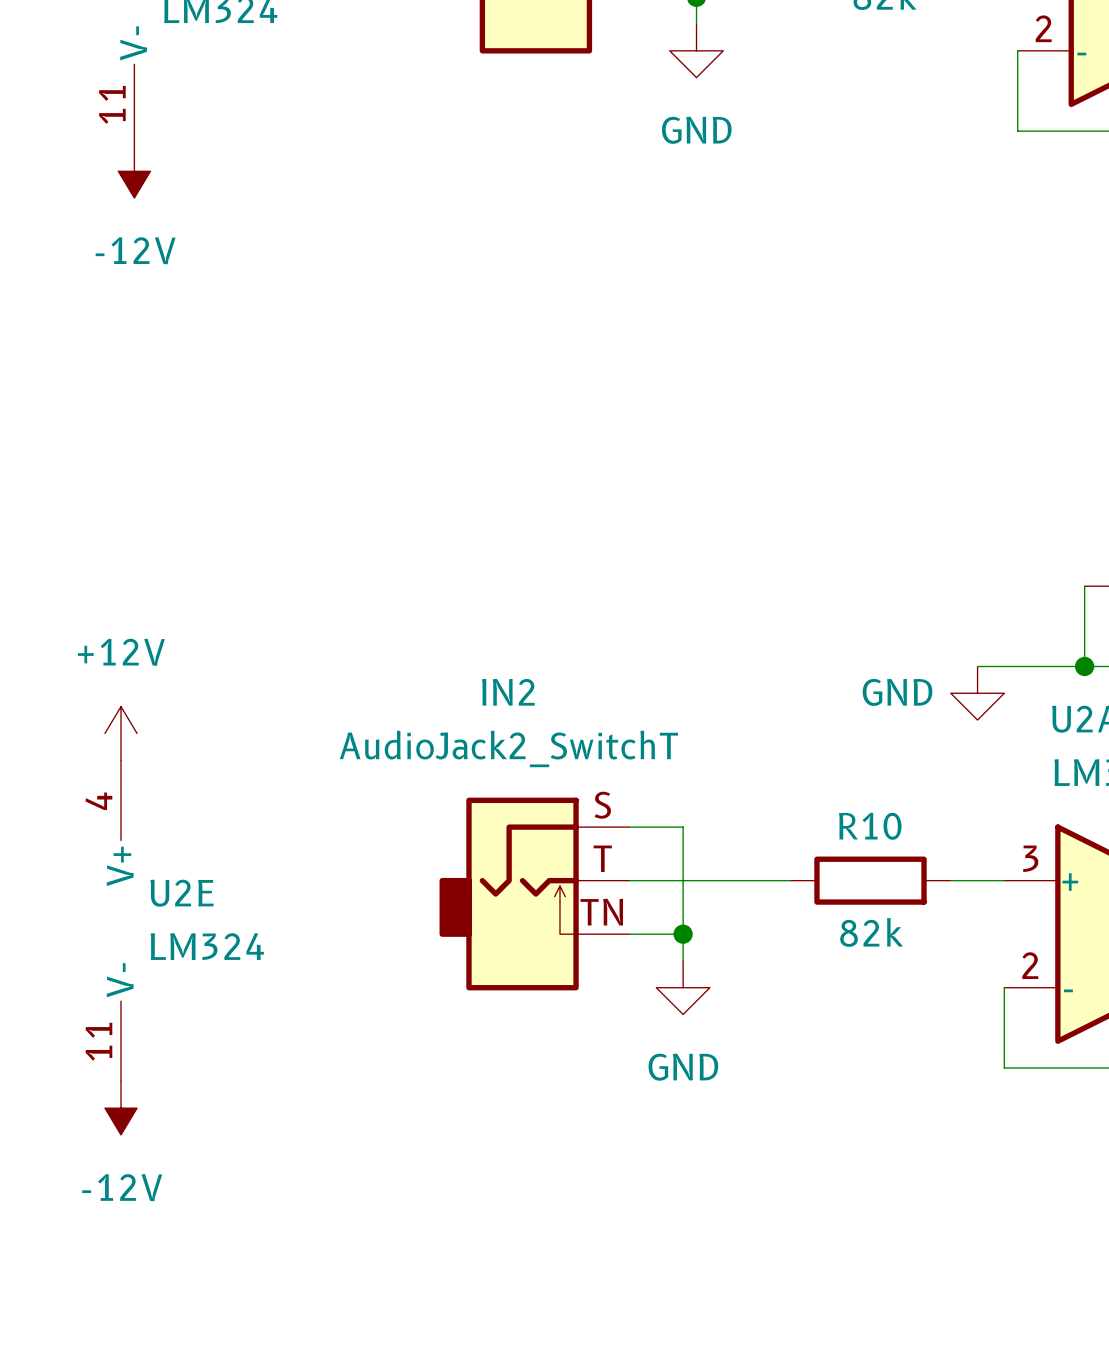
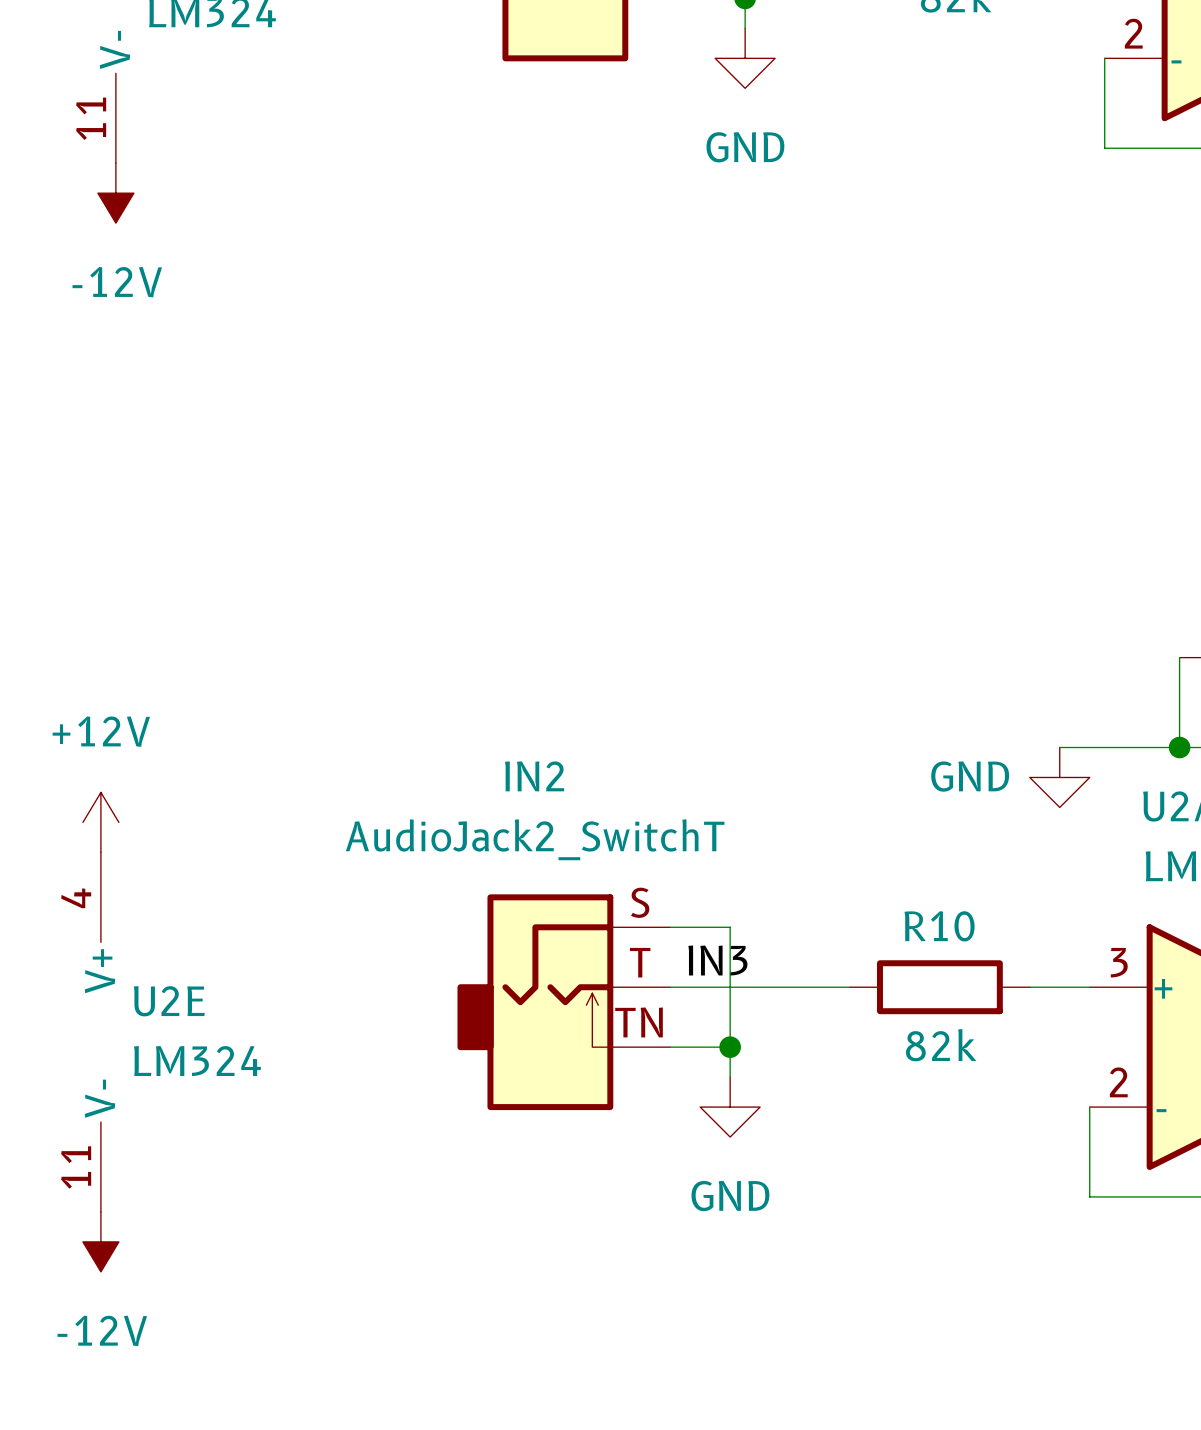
label: none -> IN3 (717, 960)

